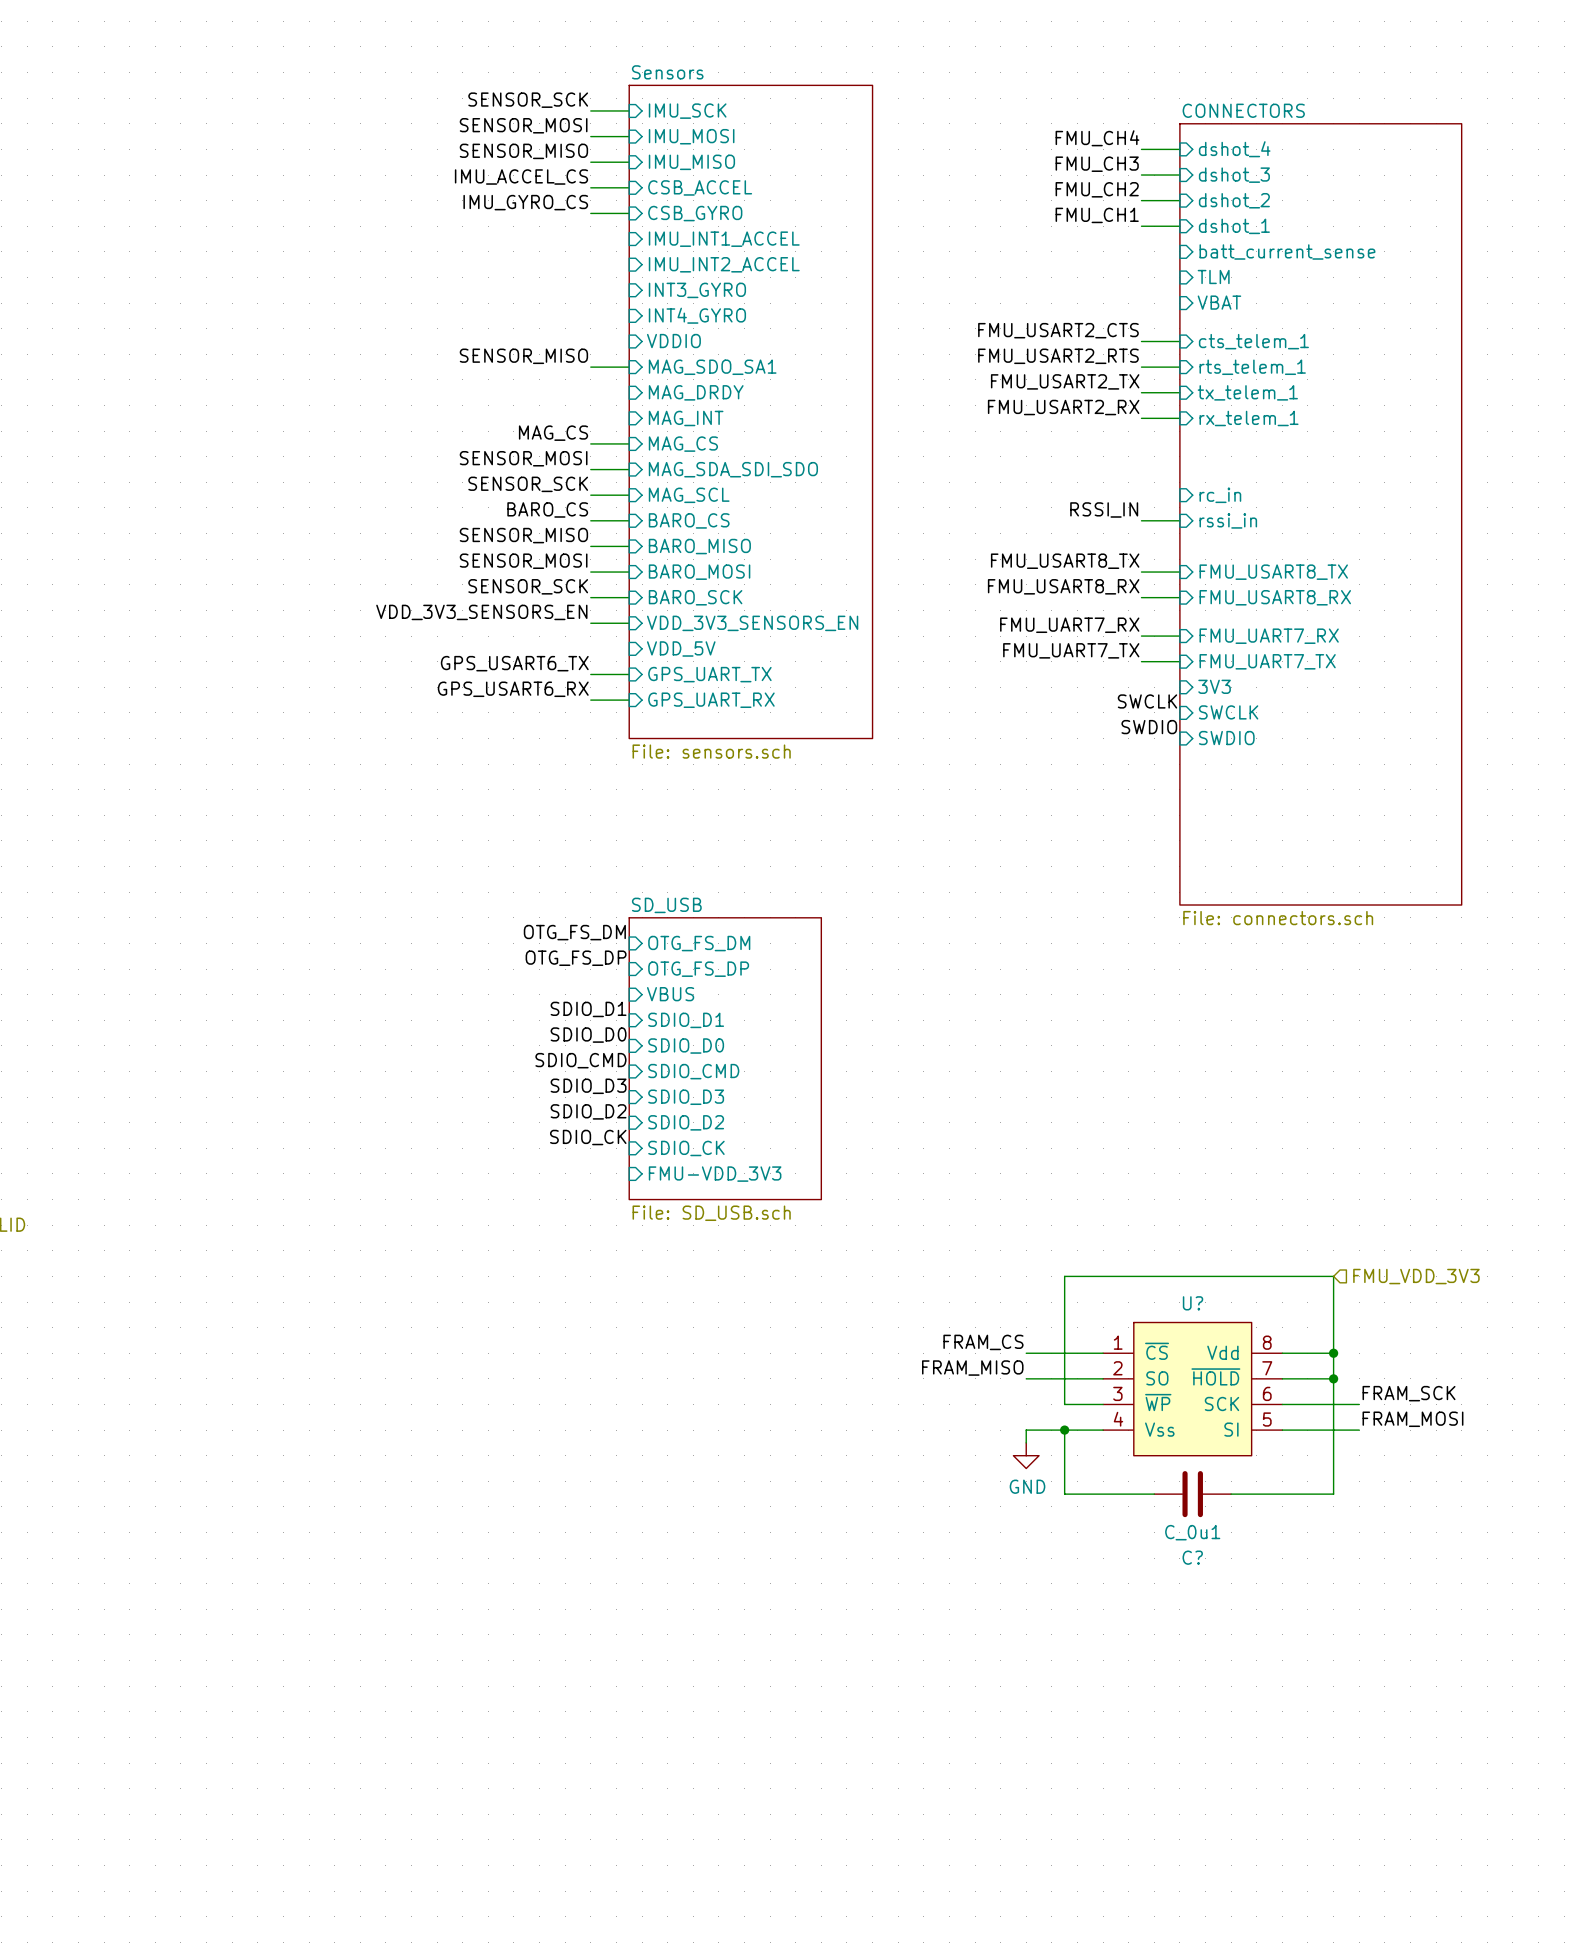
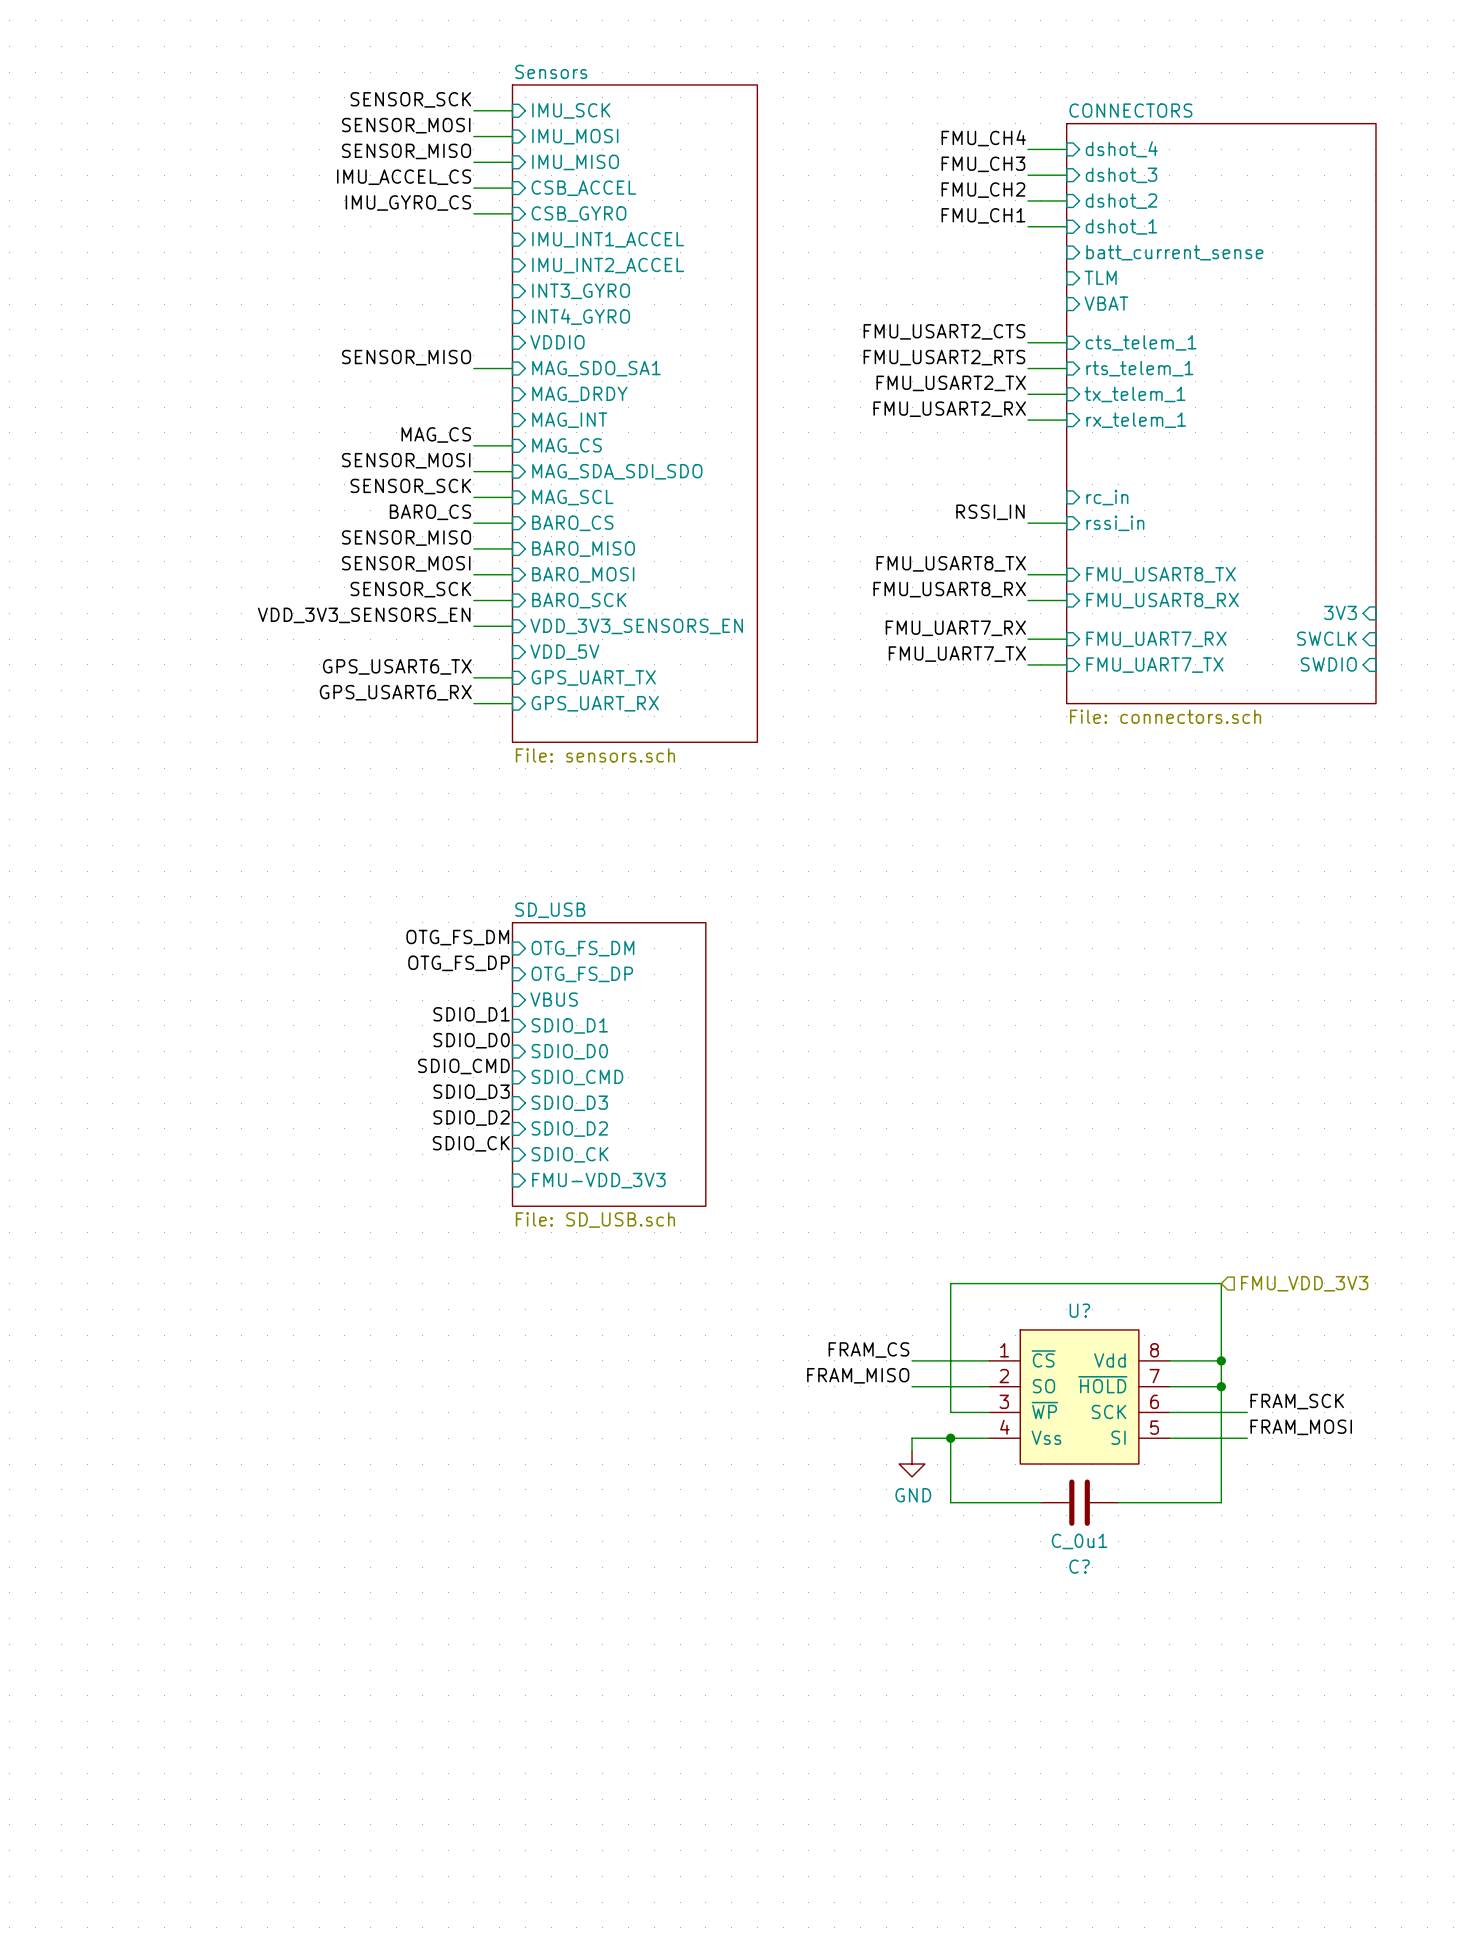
sheet CONNECTORS: none -> File: connectors.sch (1221, 413)
sheet CONNECTORS: File: connectors.sch (1320, 514) -> none
sheet pin: none -> 3V3 (1340, 612)
sheet pin: none -> SWCLK (1326, 638)
sheet pin: none -> SWDIO (1328, 664)
sheet pin: 3V3 (1214, 686) -> none
label: SWCLK (1147, 701) -> none
sheet pin: SWCLK (1228, 712) -> none
label: SWDIO (1149, 727) -> none
sheet pin: SWDIO (1226, 738) -> none

